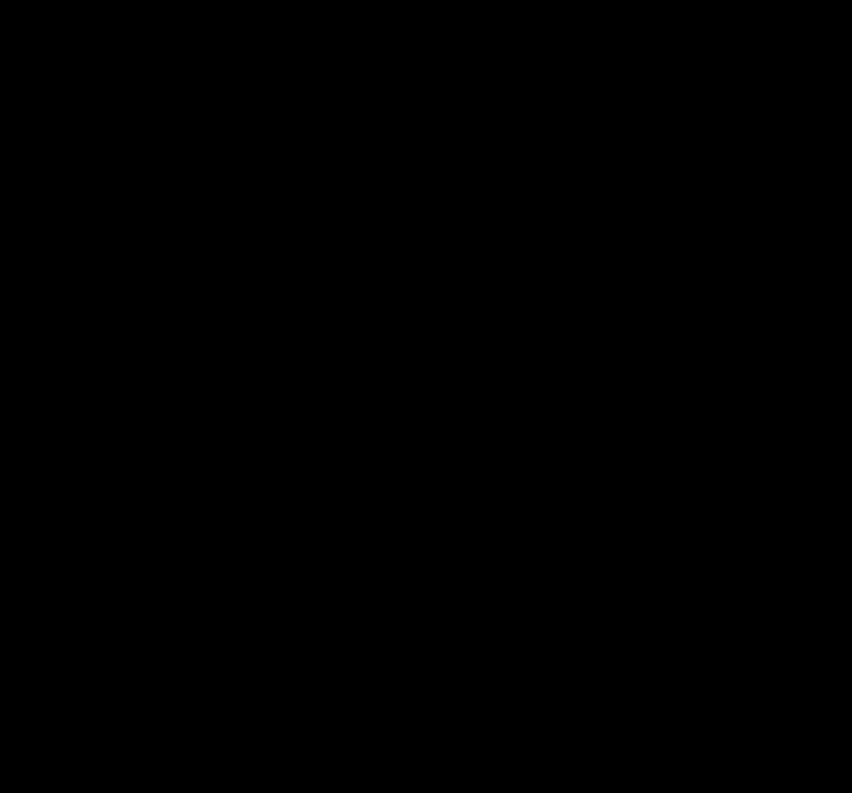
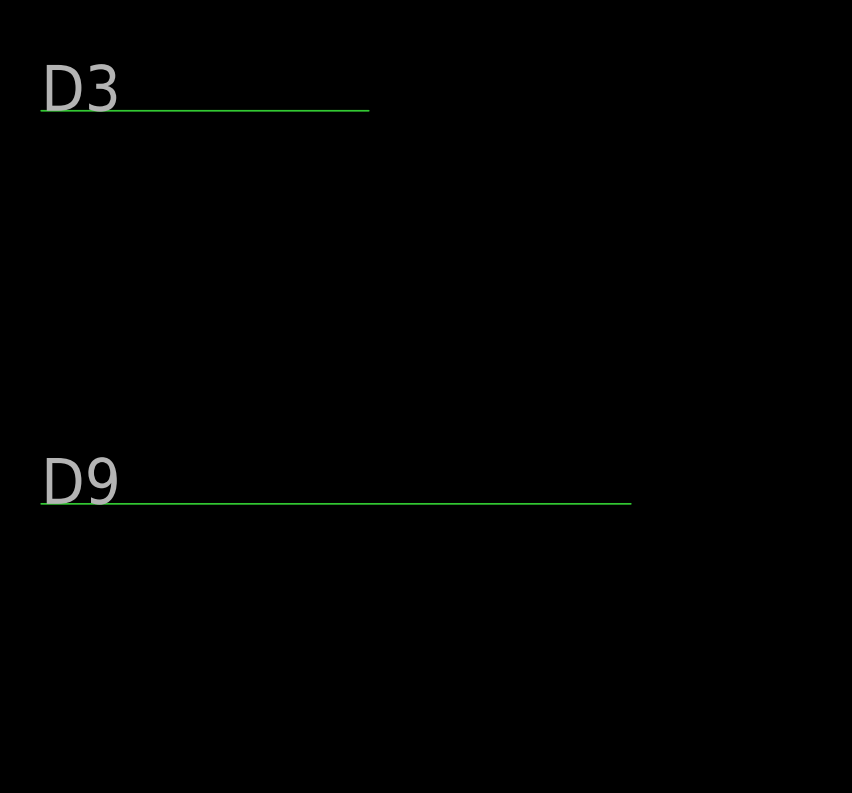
label: none -> D3 (81, 87)
wire: none -> (41, 110) (368, 110)
label: none -> D9 (81, 480)
wire: none -> (41, 503) (630, 503)

